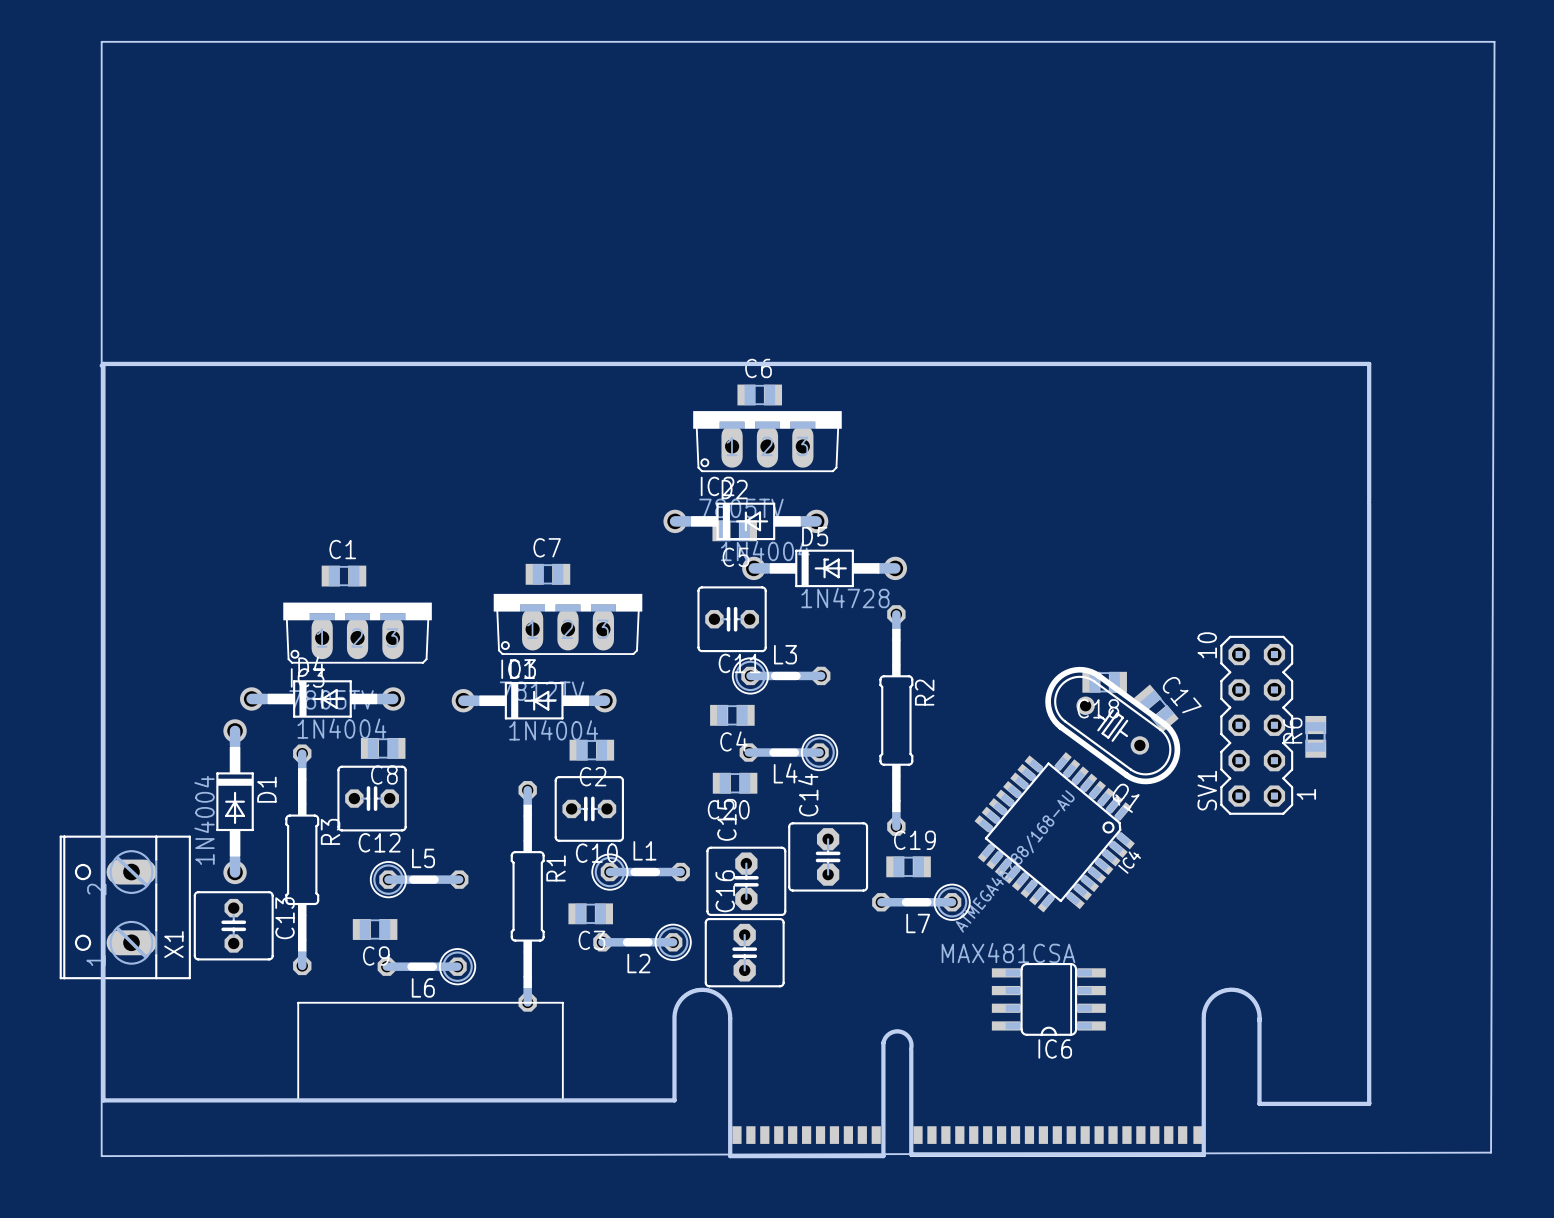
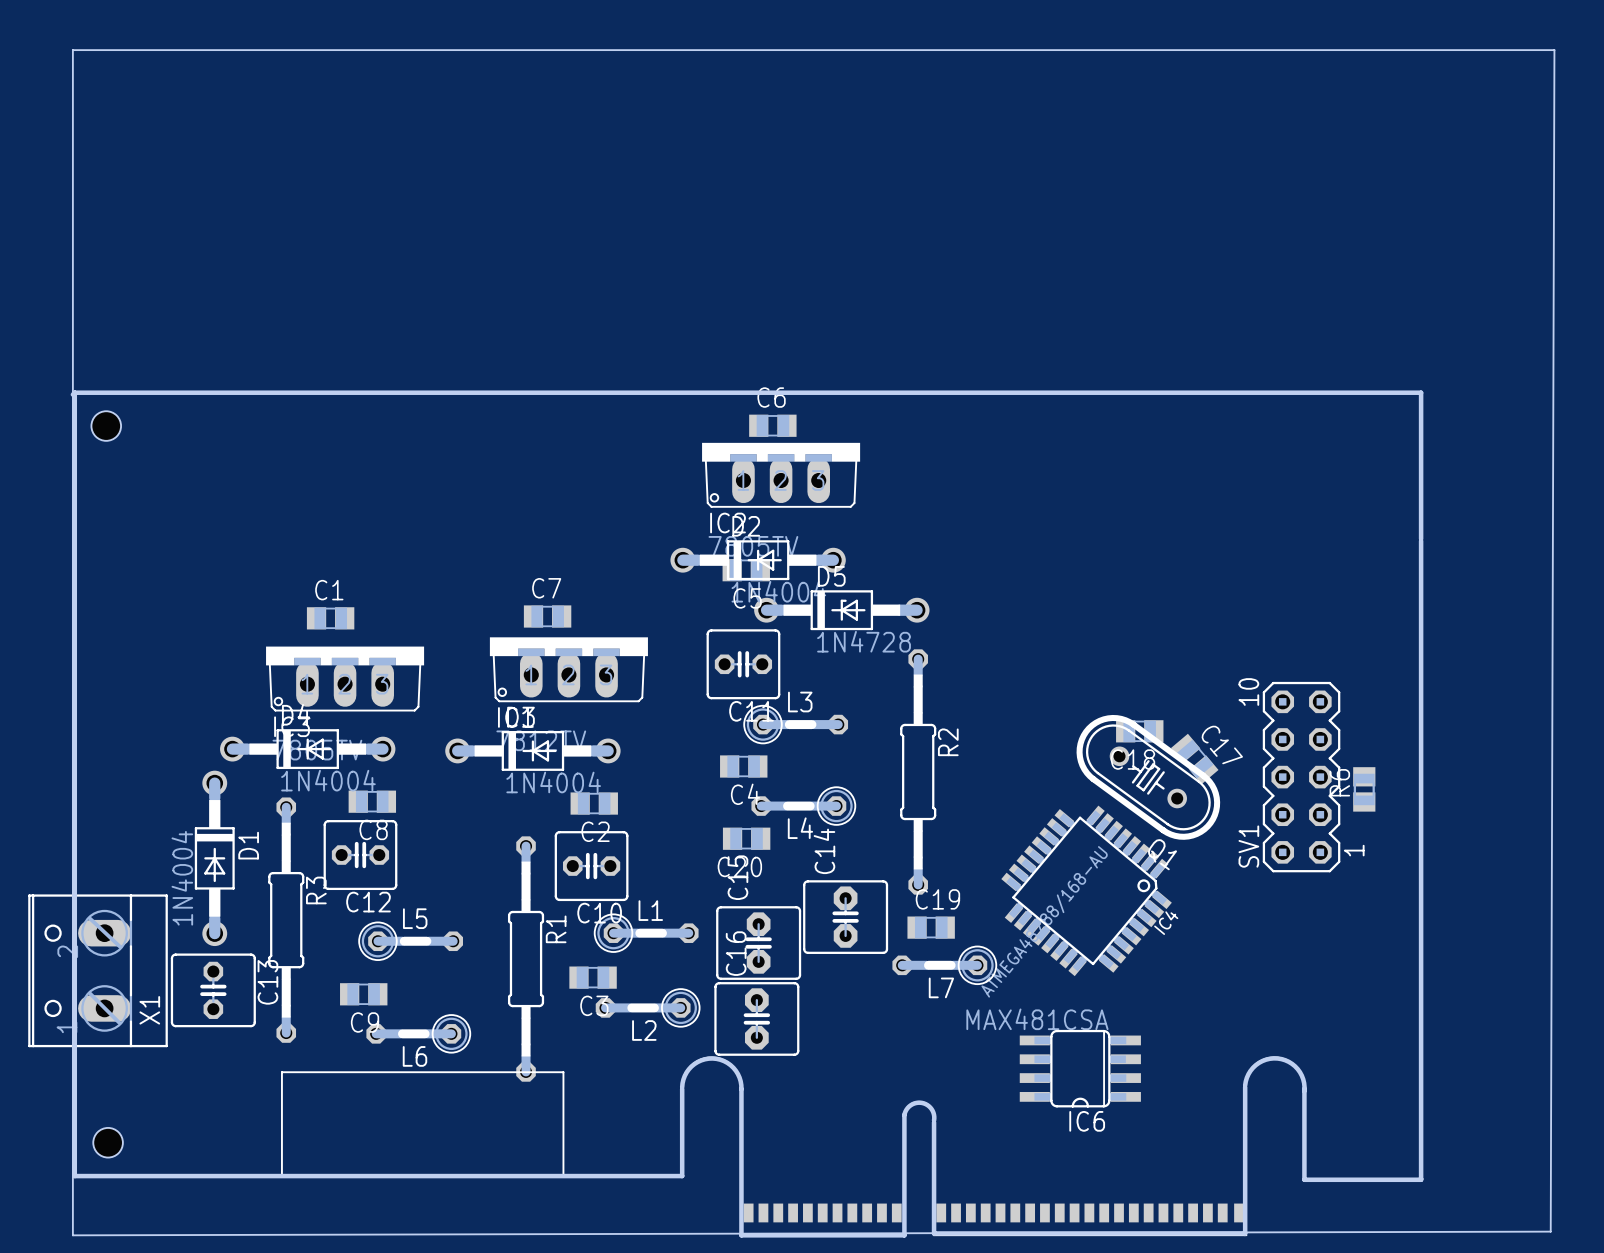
hole: none -> (106, 426)
hole: none -> (108, 1142)

